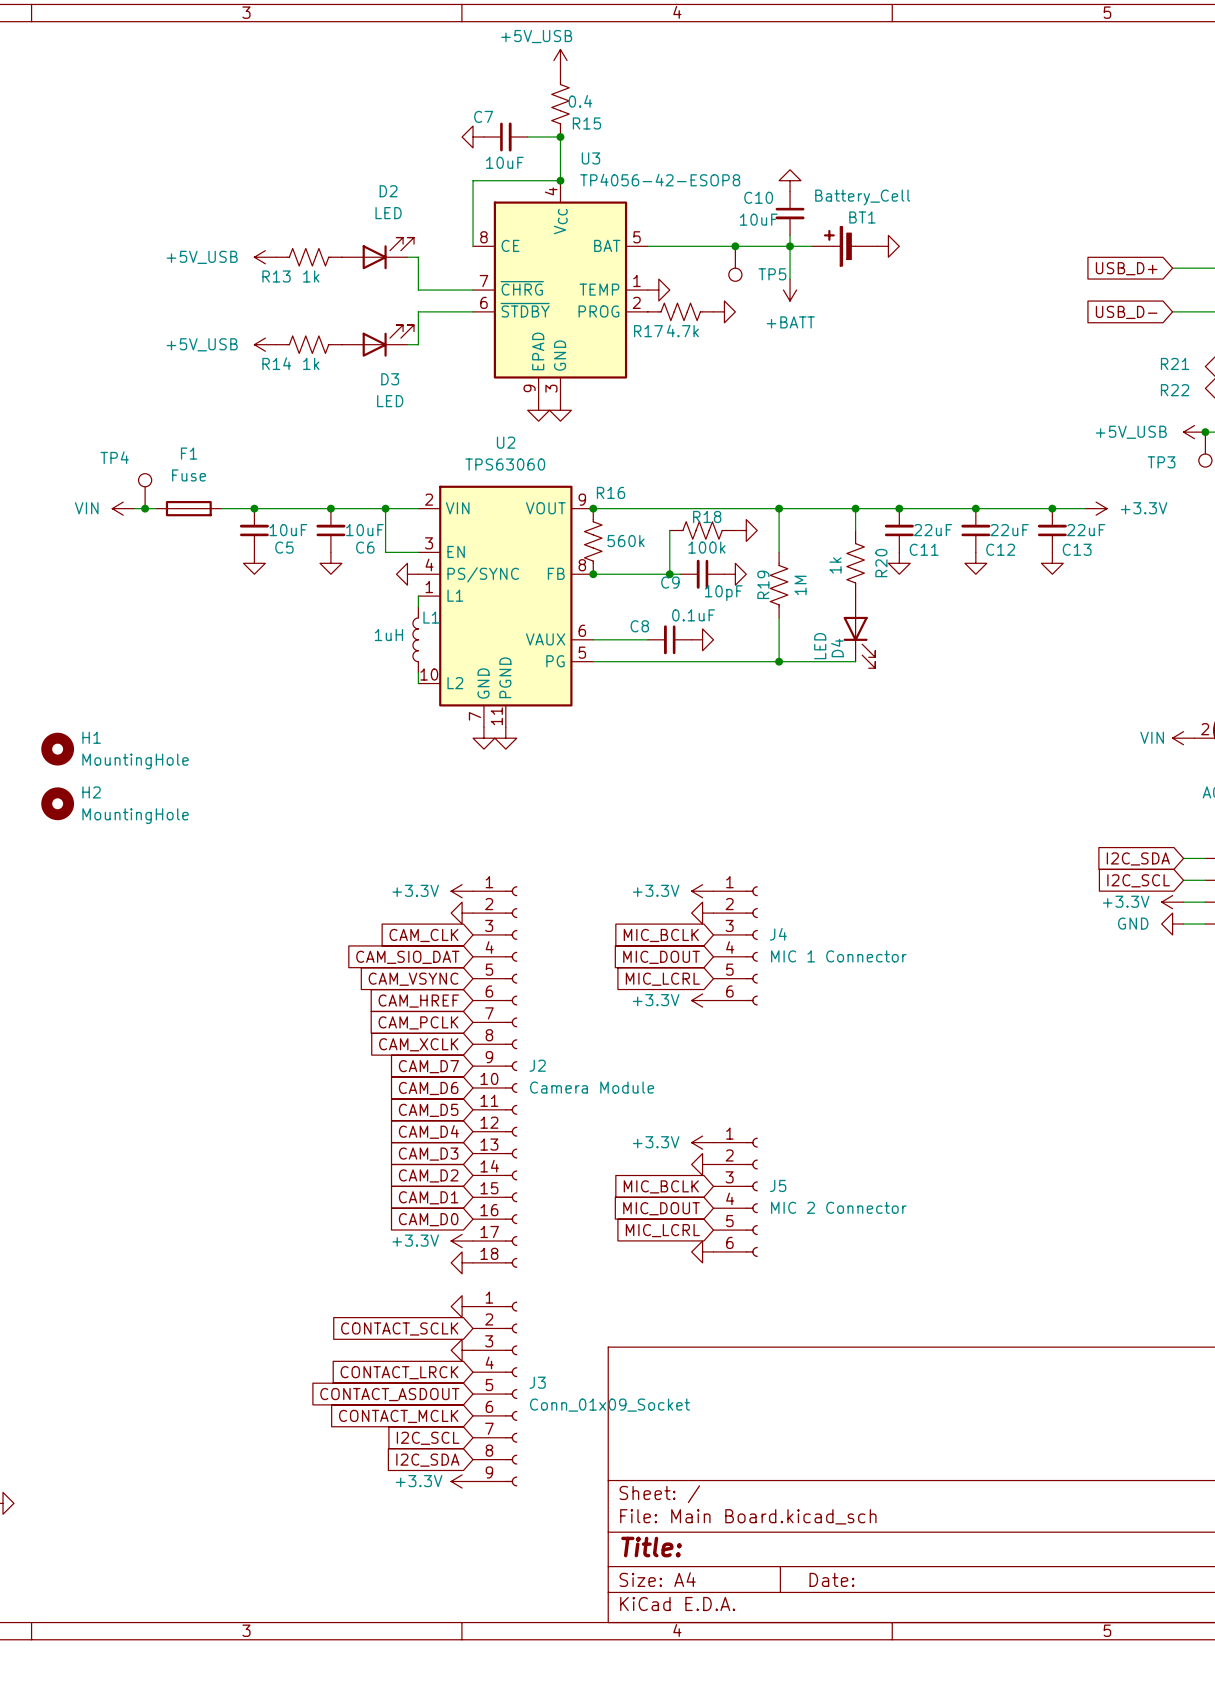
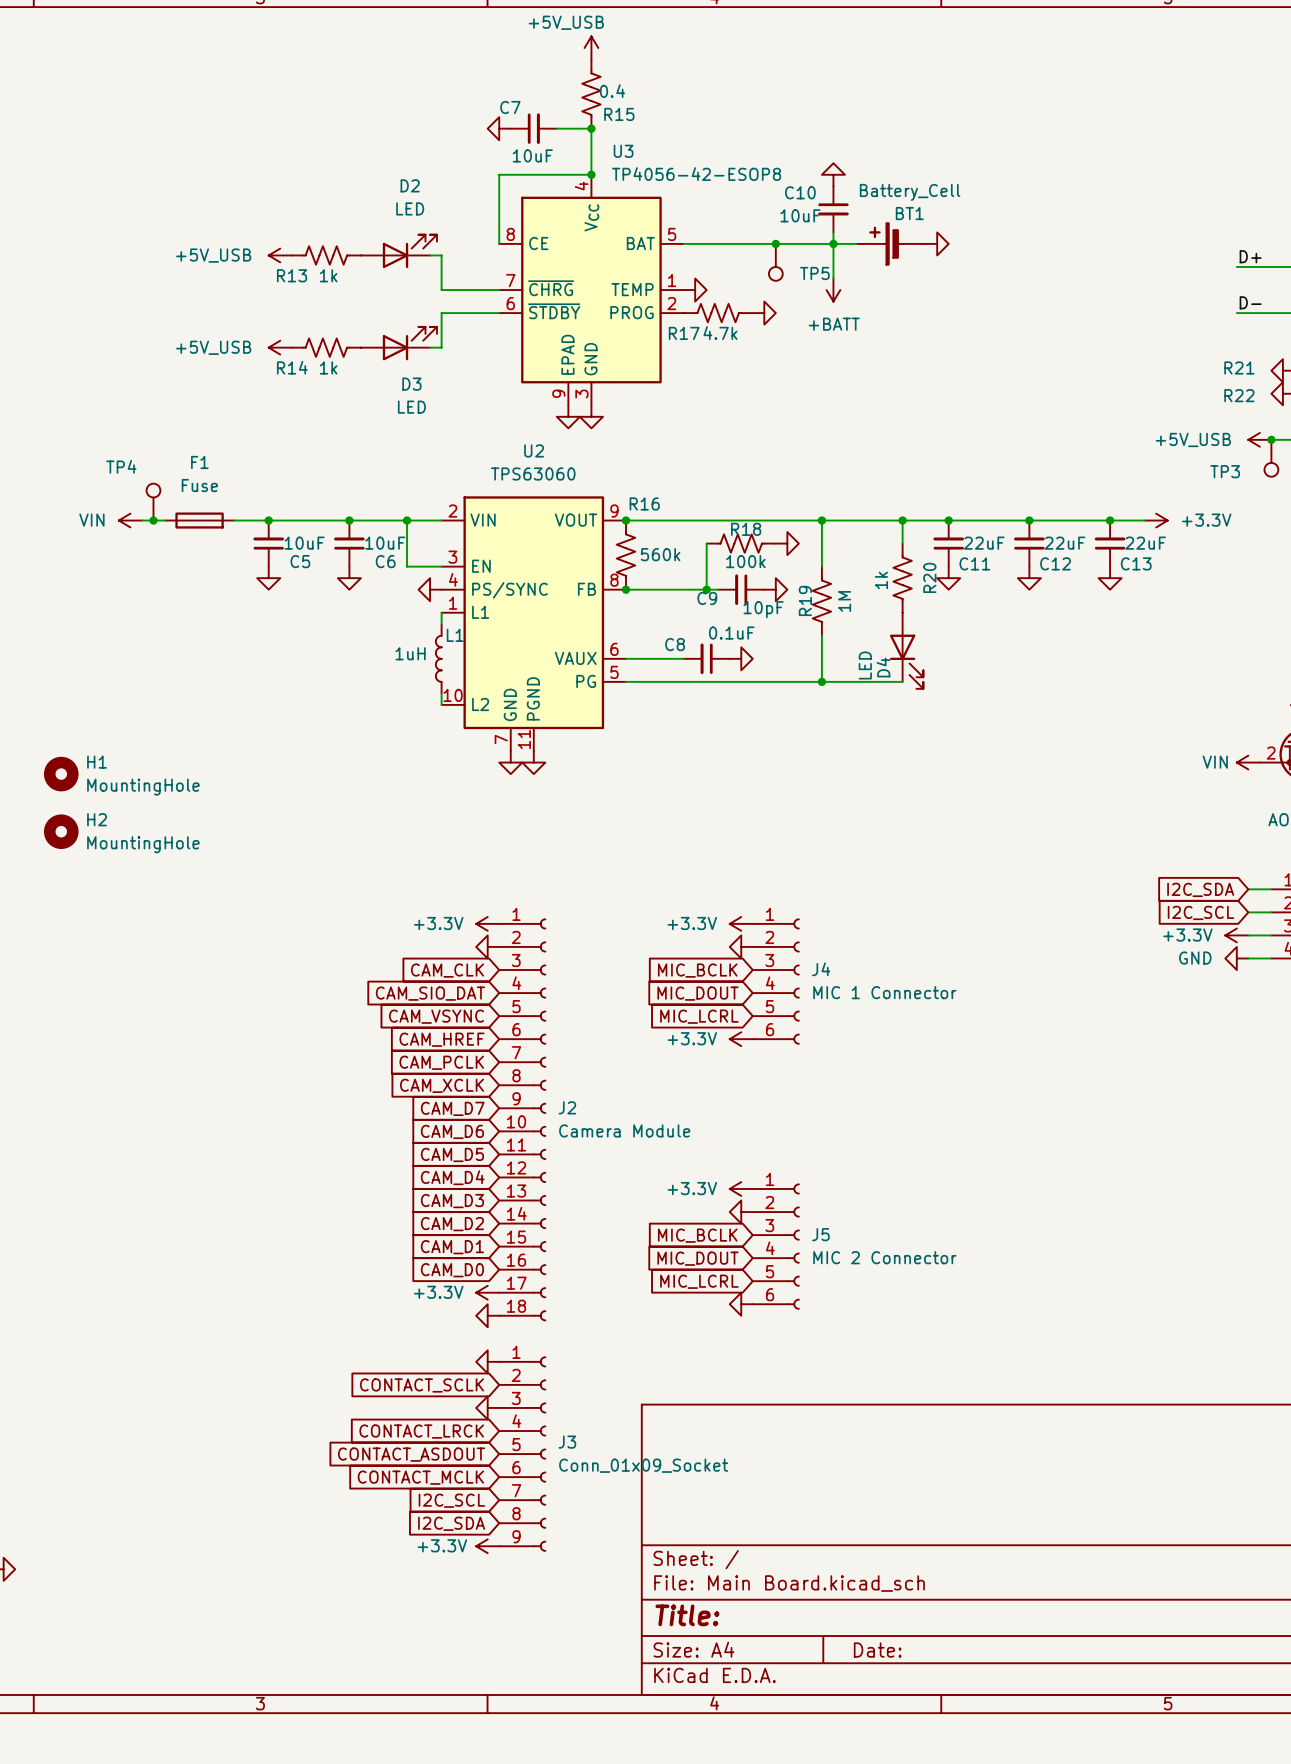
label: none -> D+ (1250, 256)
global label: USB_D+ (1126, 268) -> none
label: none -> D- (1250, 302)
global label: USB_D- (1126, 312) -> none

